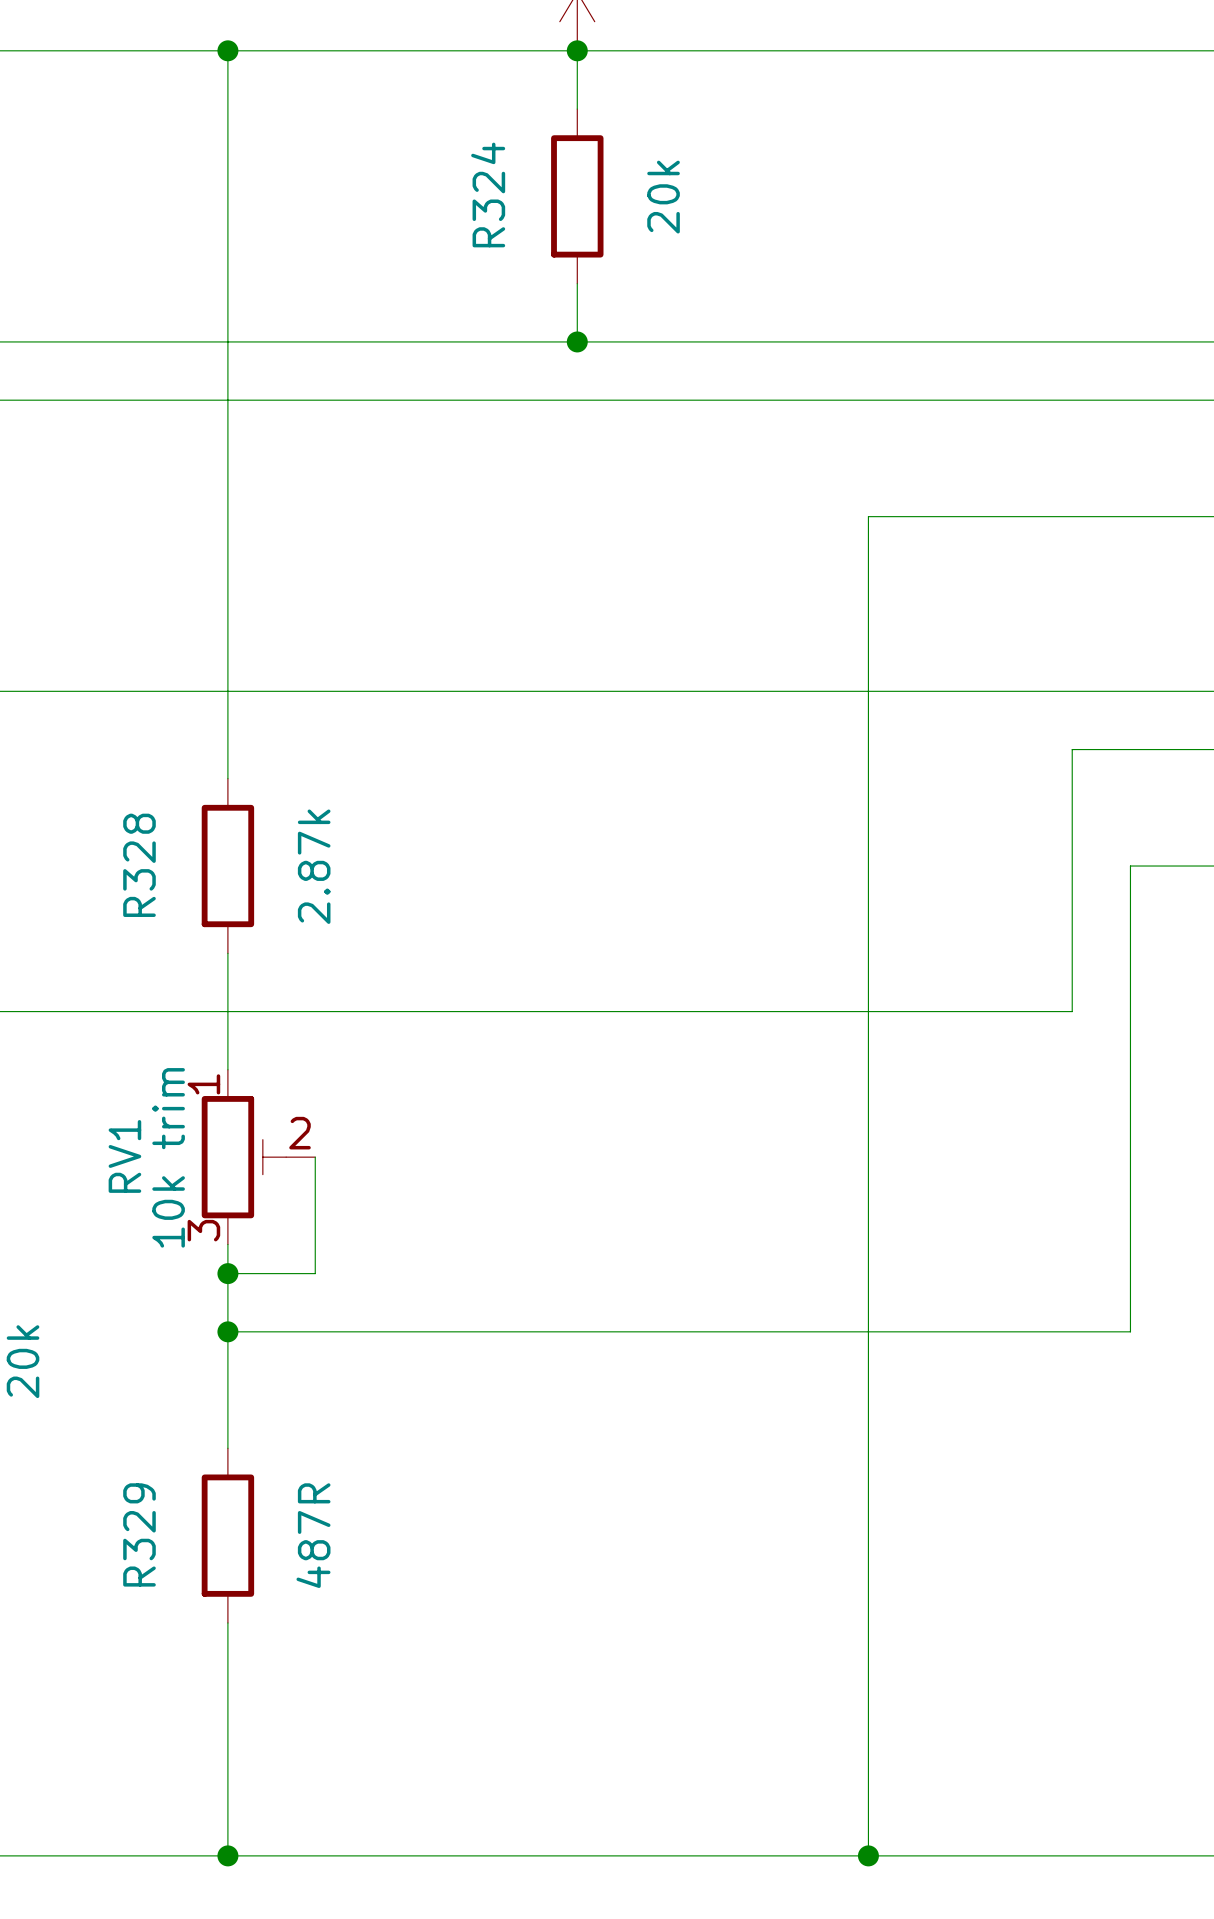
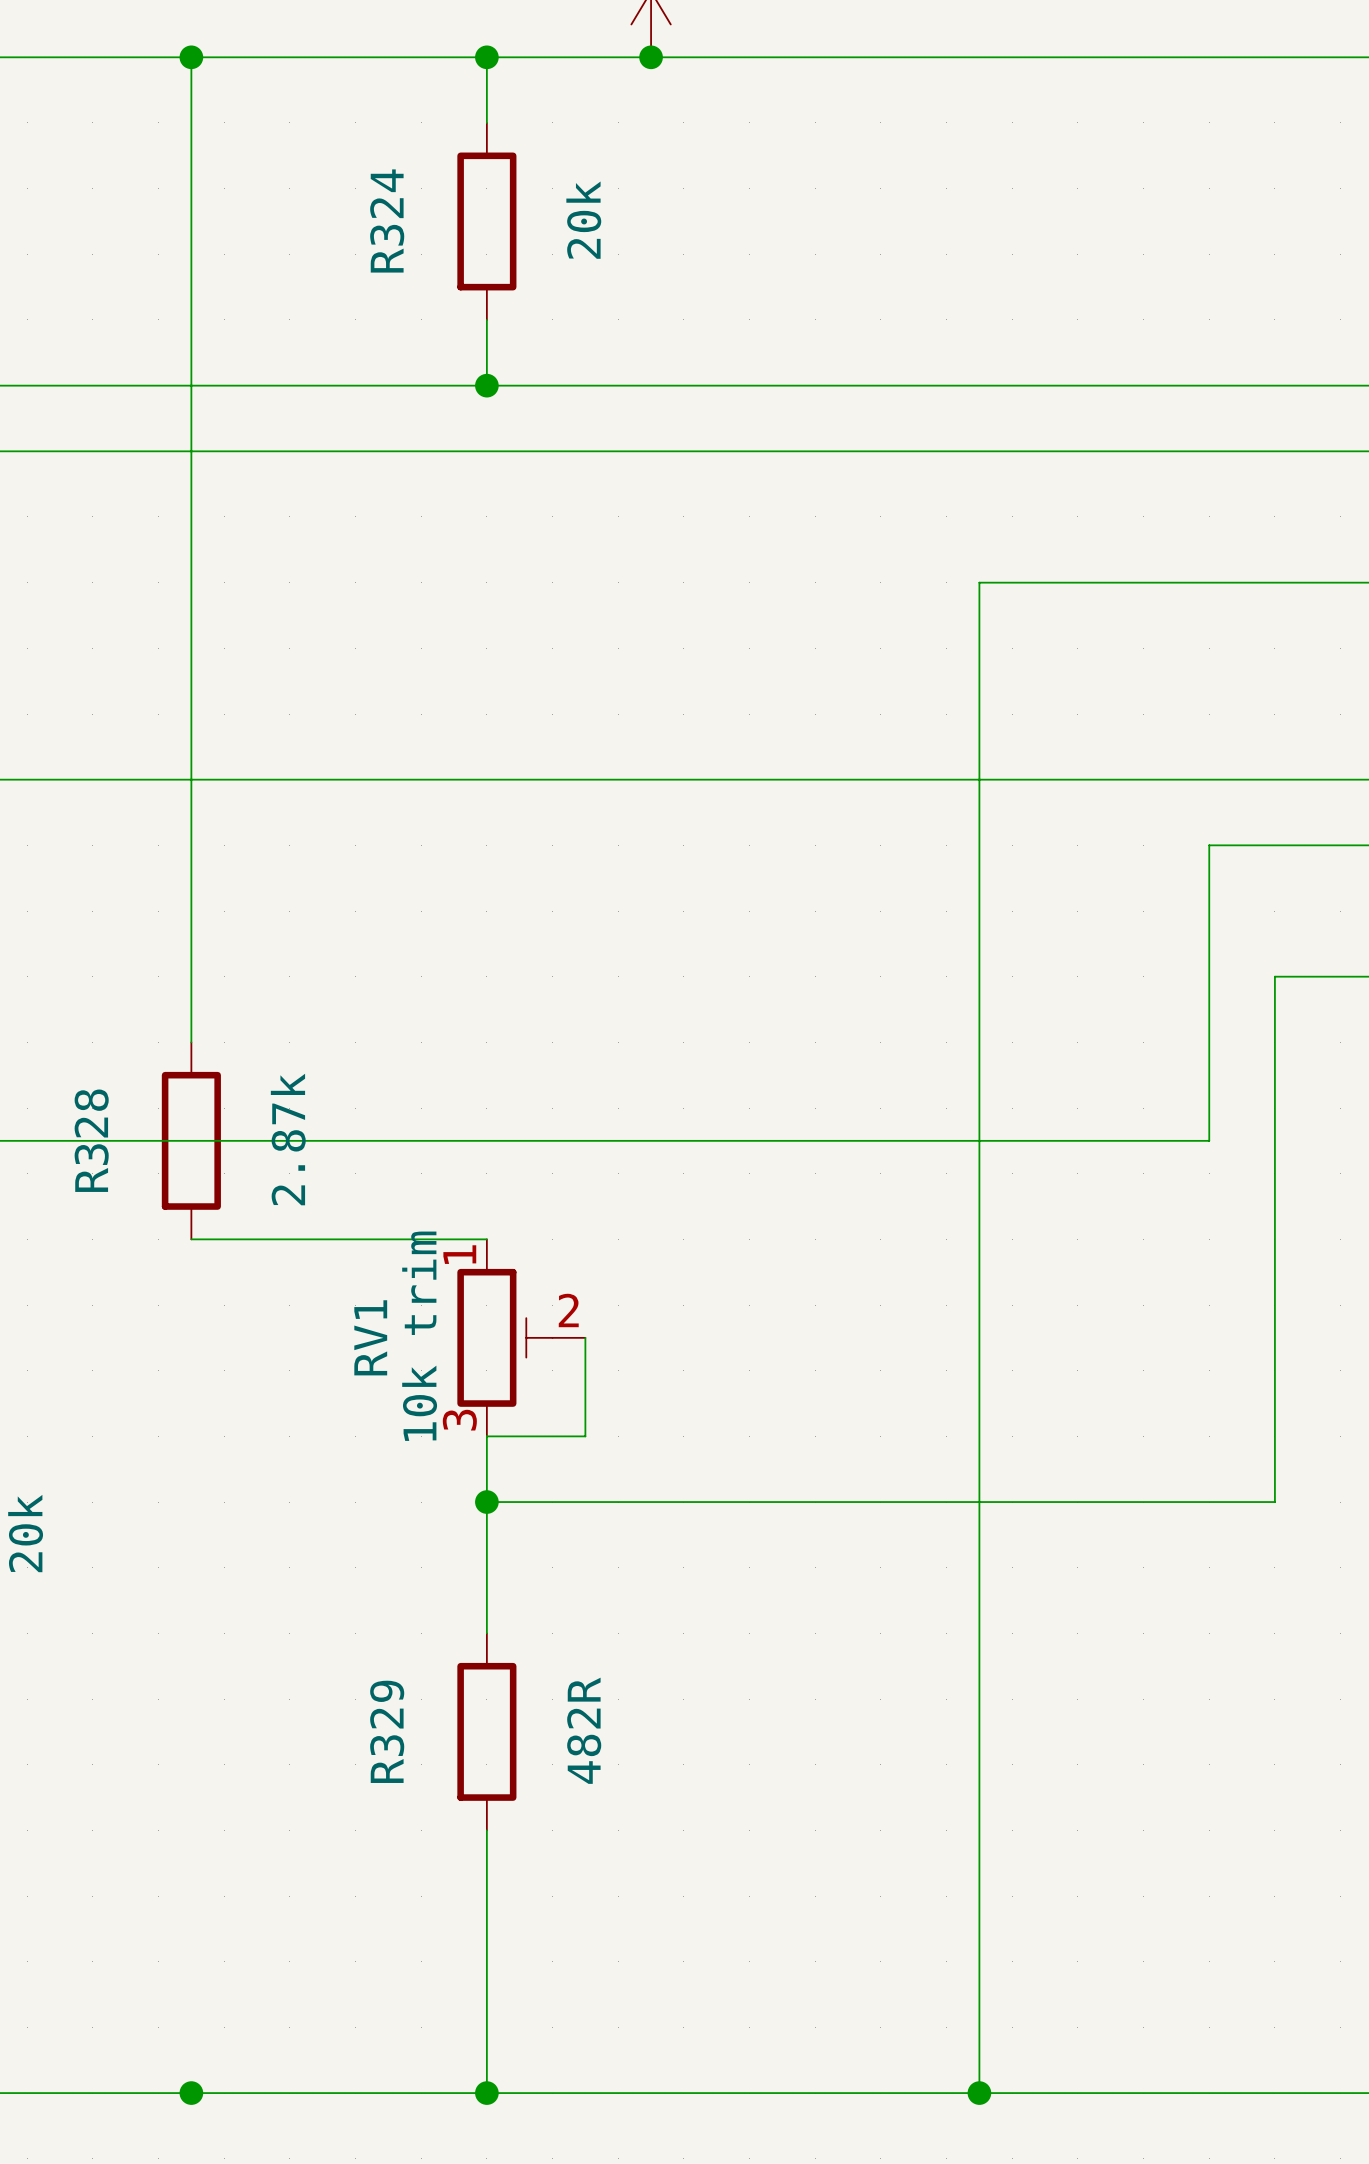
wire: none -> (191, 57) (191, 1042)
wire: (227, 50) (227, 778) -> none
junction position: (227, 50) -> (191, 57)
junction: none -> (486, 57)
wire: (577, 50) (577, 109) -> (486, 57) (486, 122)
R324 position: (577, 196) -> (486, 221)
wire: (577, 283) (577, 341) -> (486, 319) (486, 385)
junction: none -> (486, 385)
junction: (577, 341) -> none
R328 position: (227, 866) -> (191, 1140)
wire: (227, 953) (227, 1069) -> none
wire: none -> (191, 1239) (486, 1239)
RV1 position: (258, 1157) -> (521, 1337)
wire: (315, 1157) (315, 1273) (227, 1273) -> none
wire: none -> (585, 1337) (585, 1436) (486, 1436) (486, 1633)
wire: (227, 1244) (227, 1448) -> none
junction: (227, 1273) -> none
wire: (227, 1331) (431, 1331) -> none
junction: (227, 1331) -> none
junction: none -> (486, 1502)
R329 position: (227, 1535) -> (486, 1731)
R329 value: 487R (313, 1535) -> 482R (584, 1730)
wire: (227, 1622) (227, 1855) -> (486, 1830) (486, 2093)
junction position: (227, 1855) -> (191, 2093)
junction: none -> (486, 2093)

